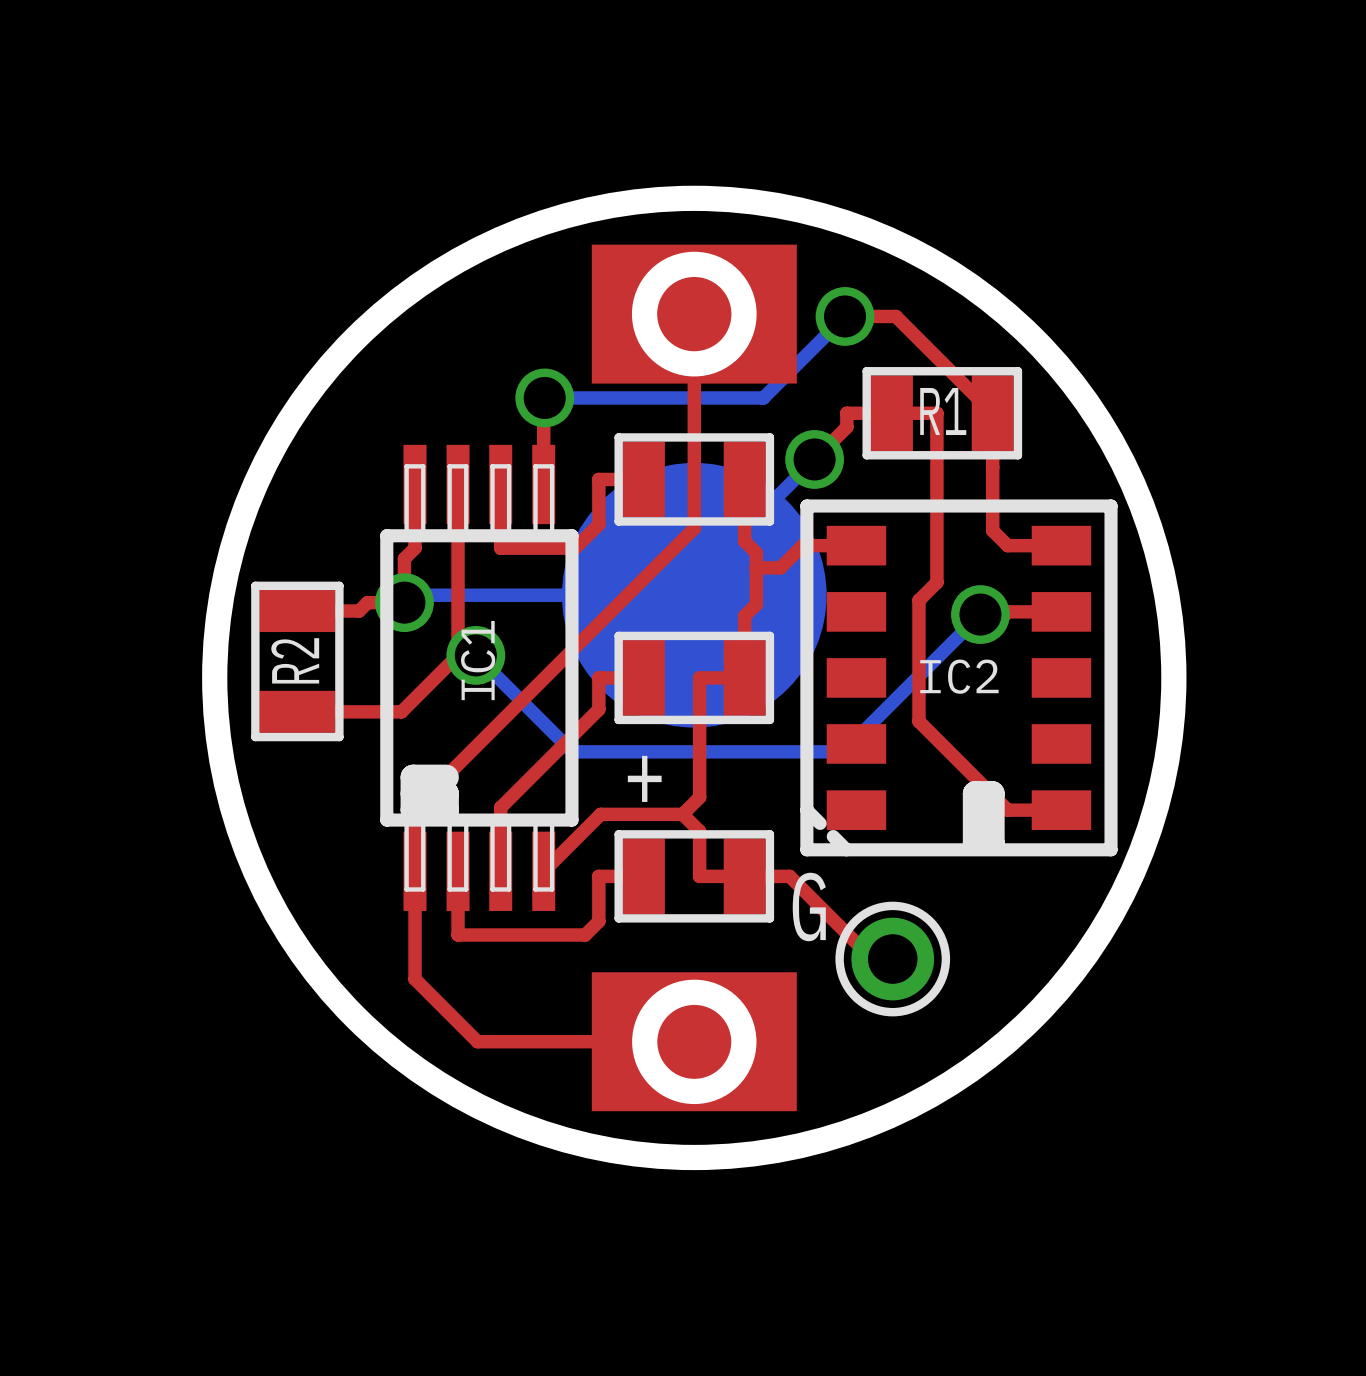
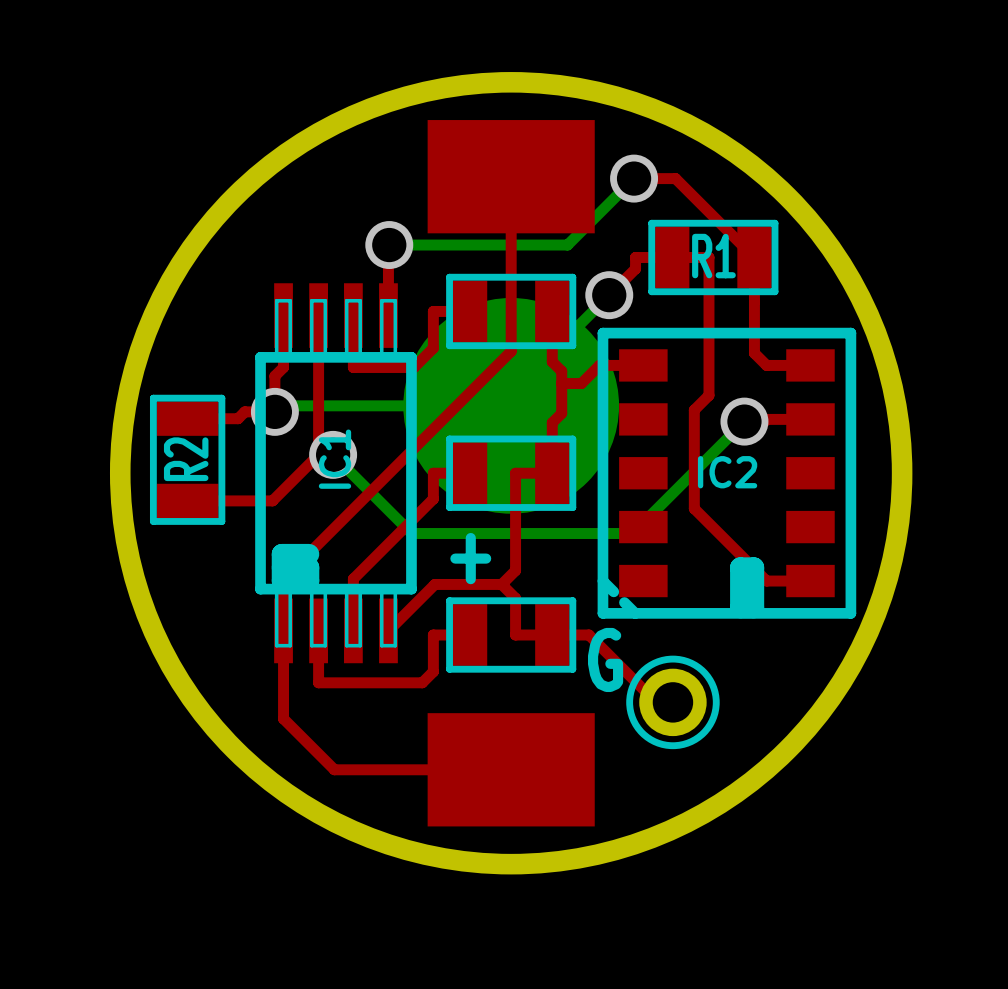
round board edge: [631, 251, 757, 377] -> none
round board edge: [632, 979, 757, 1105] -> none

